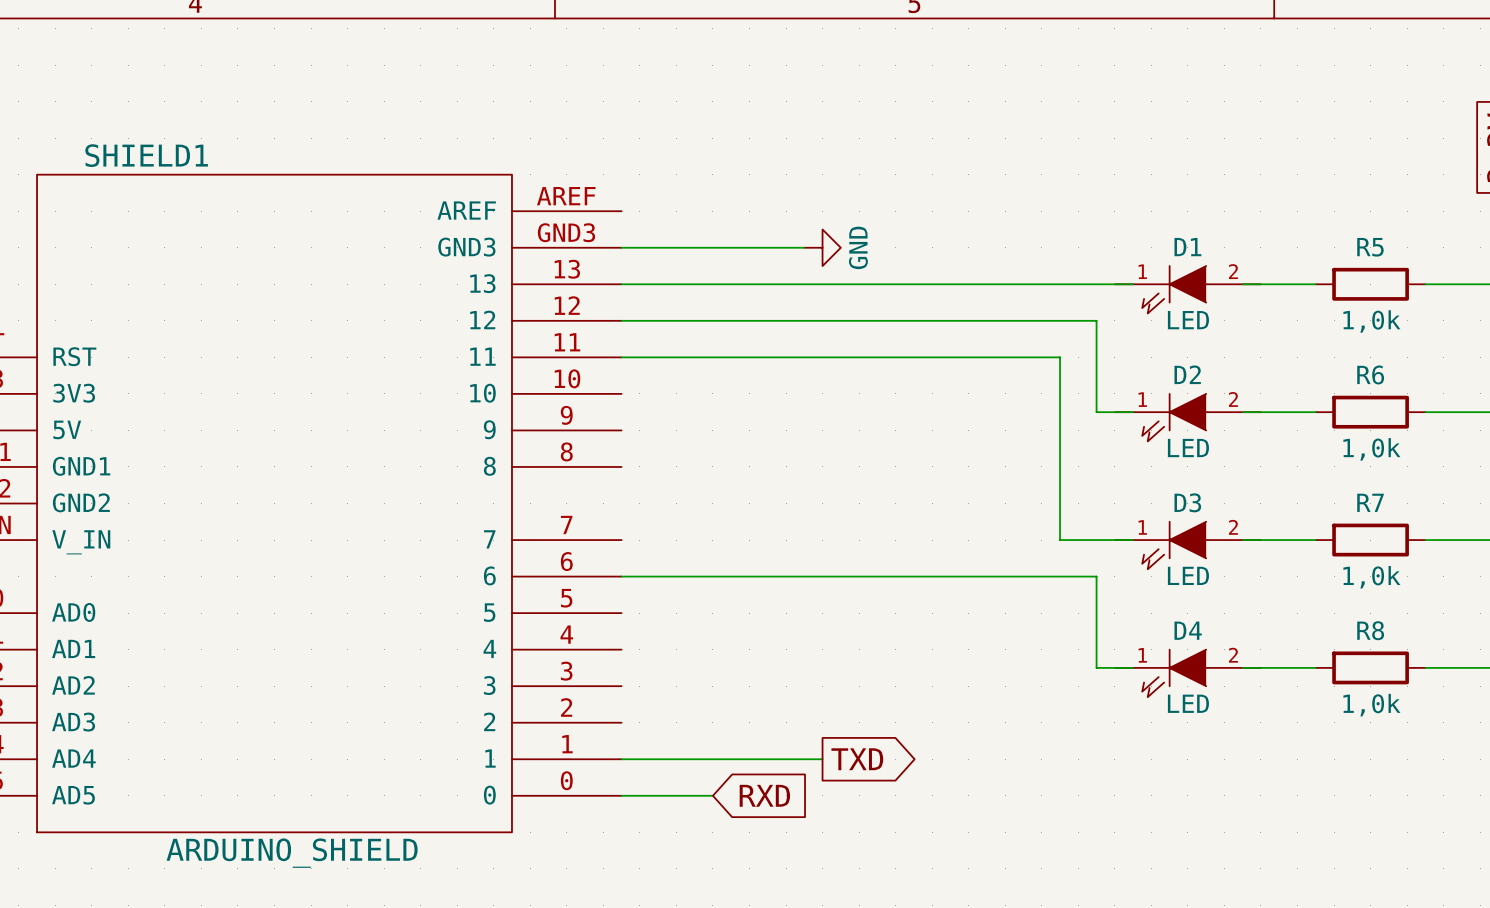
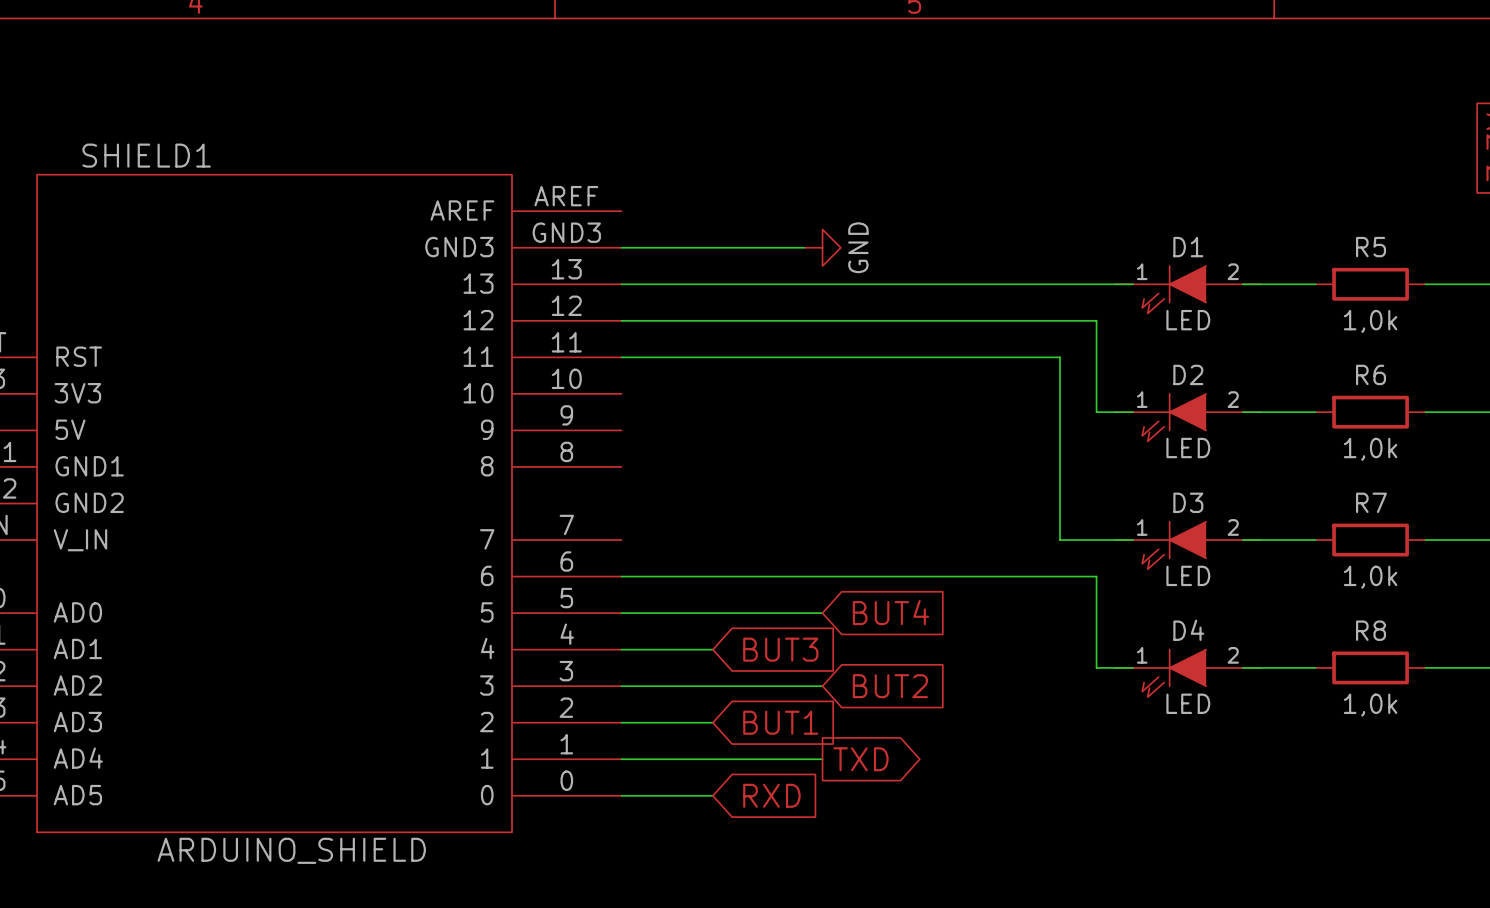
wire: none -> (621, 613) (822, 613)
global label: none -> BUT4 (890, 612)
wire: none -> (621, 649) (712, 649)
global label: none -> BUT3 (780, 649)
wire: none -> (621, 686) (822, 686)
global label: none -> BUT2 (890, 686)
wire: none -> (621, 722) (712, 722)
global label: none -> BUT1 (780, 722)

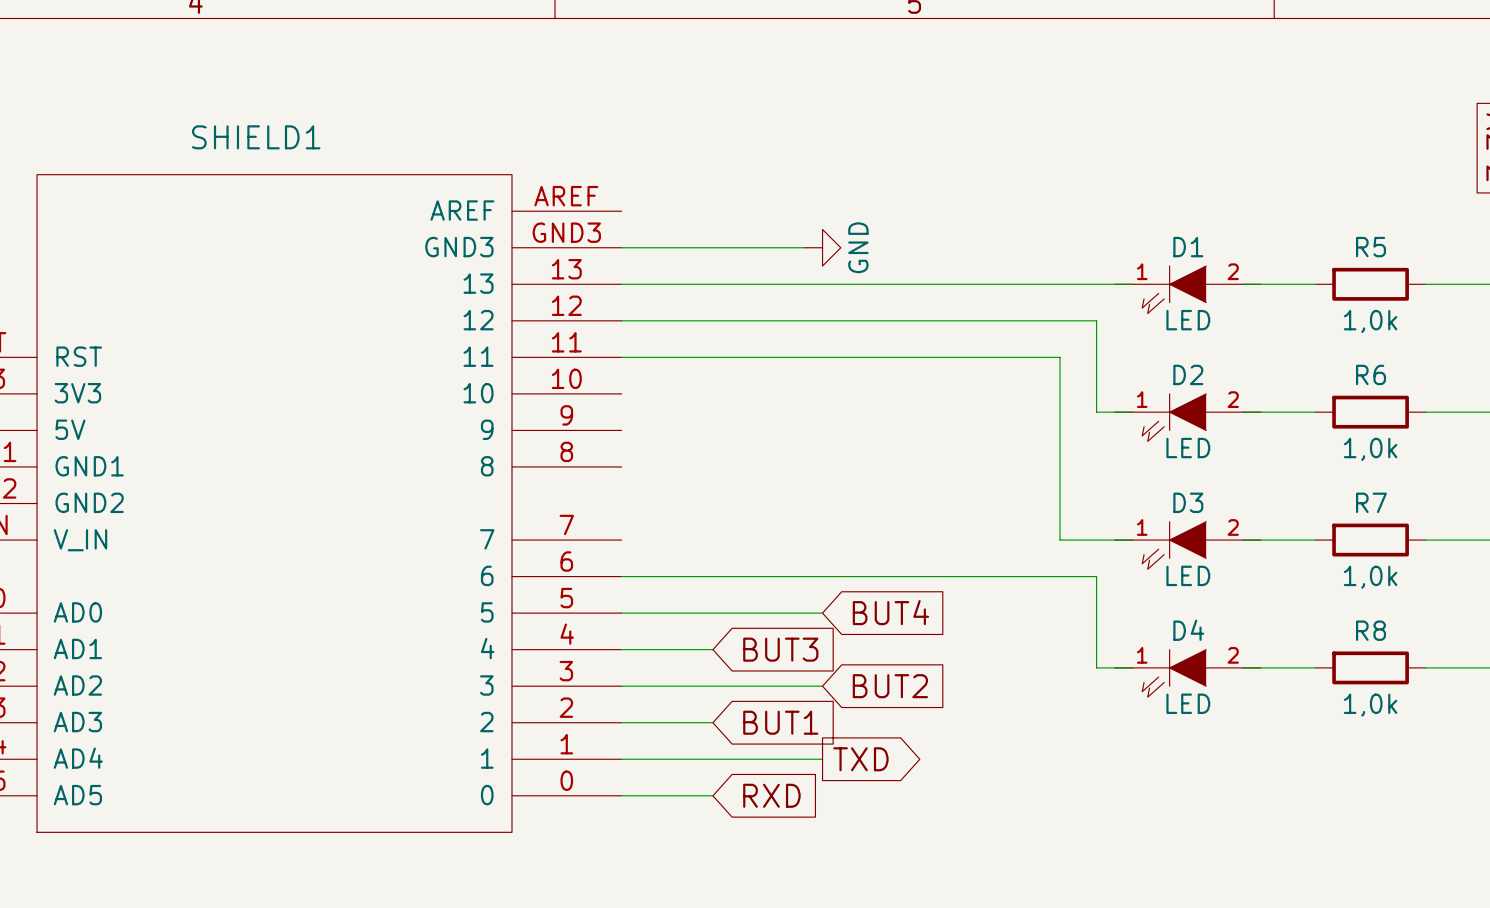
SHIELD1 name position: SHIELD1 (146, 155) -> SHIELD1 (256, 137)
SHIELD1 value: ARDUINO_SHIELD (291, 850) -> none

